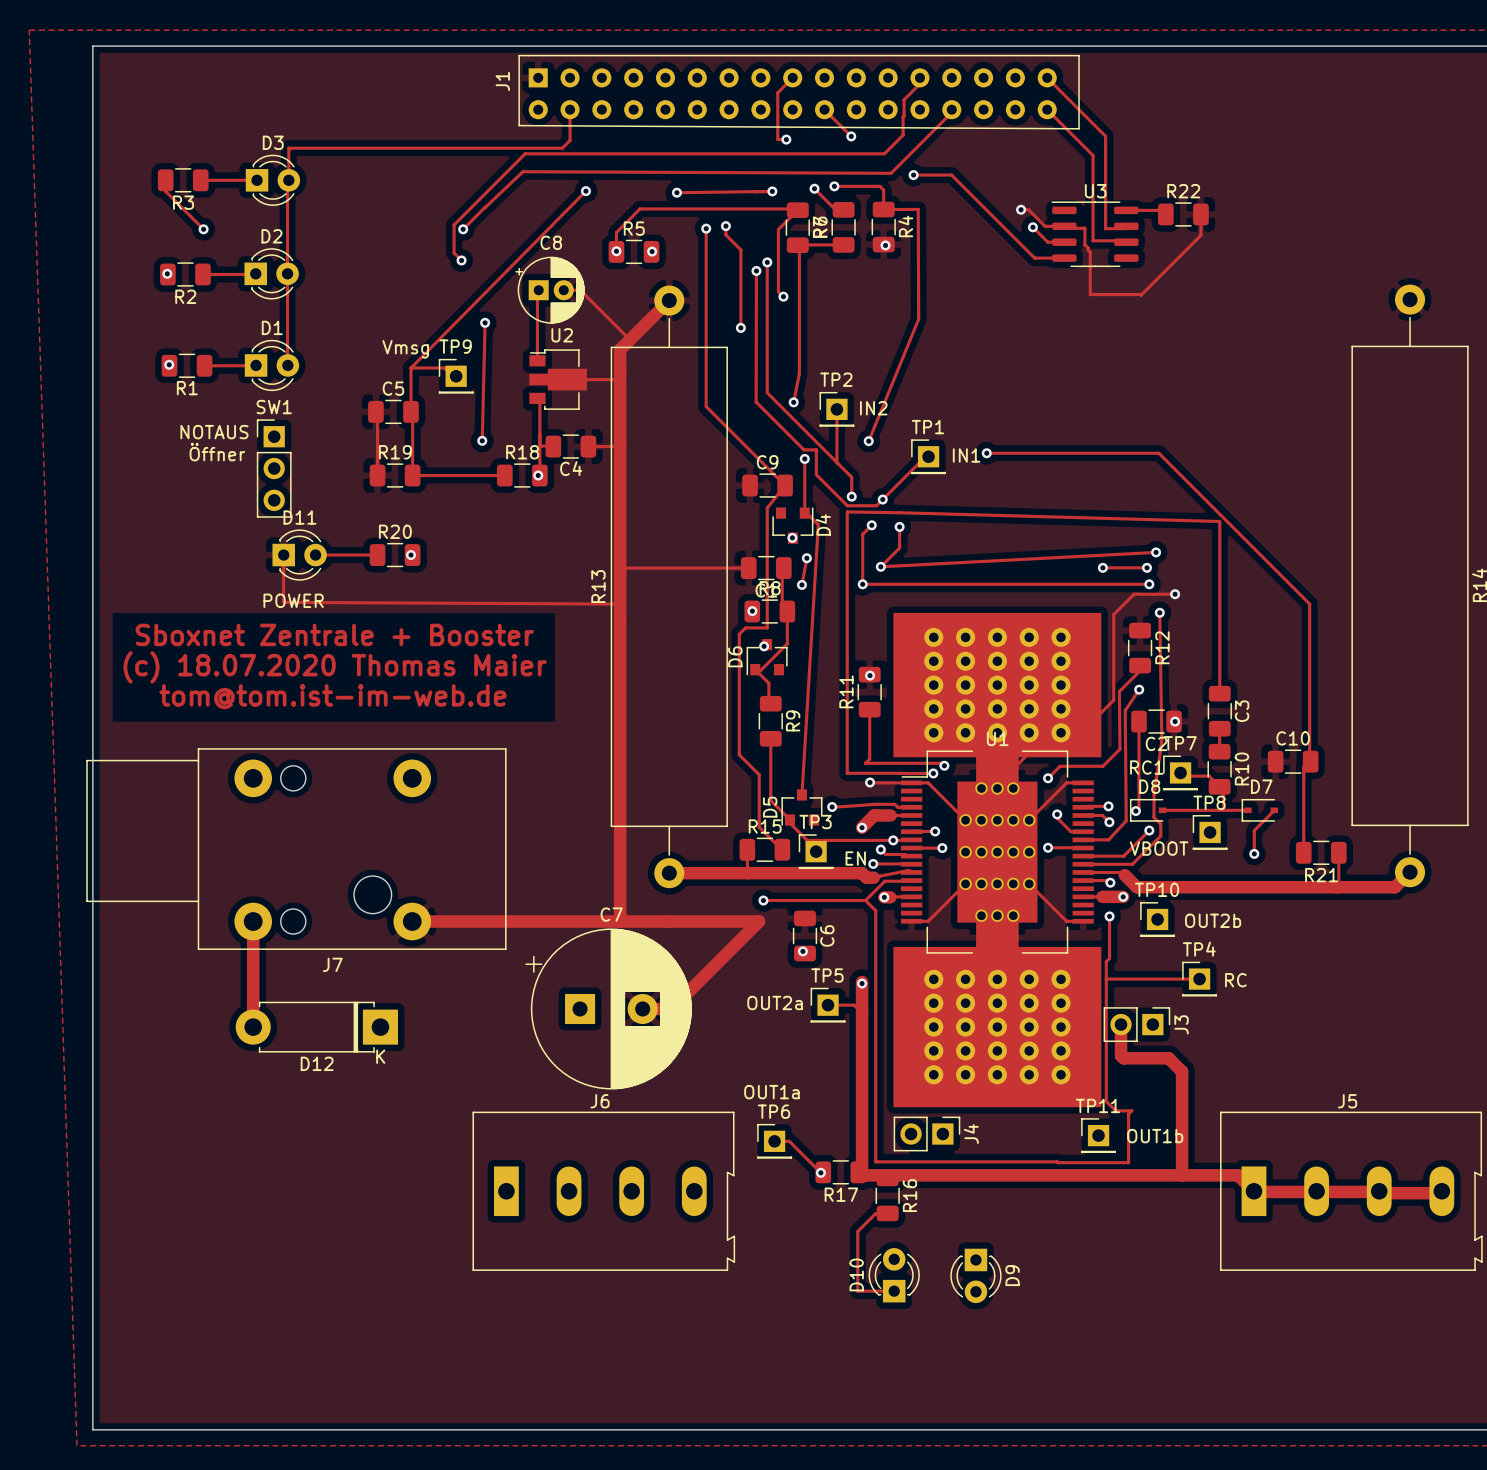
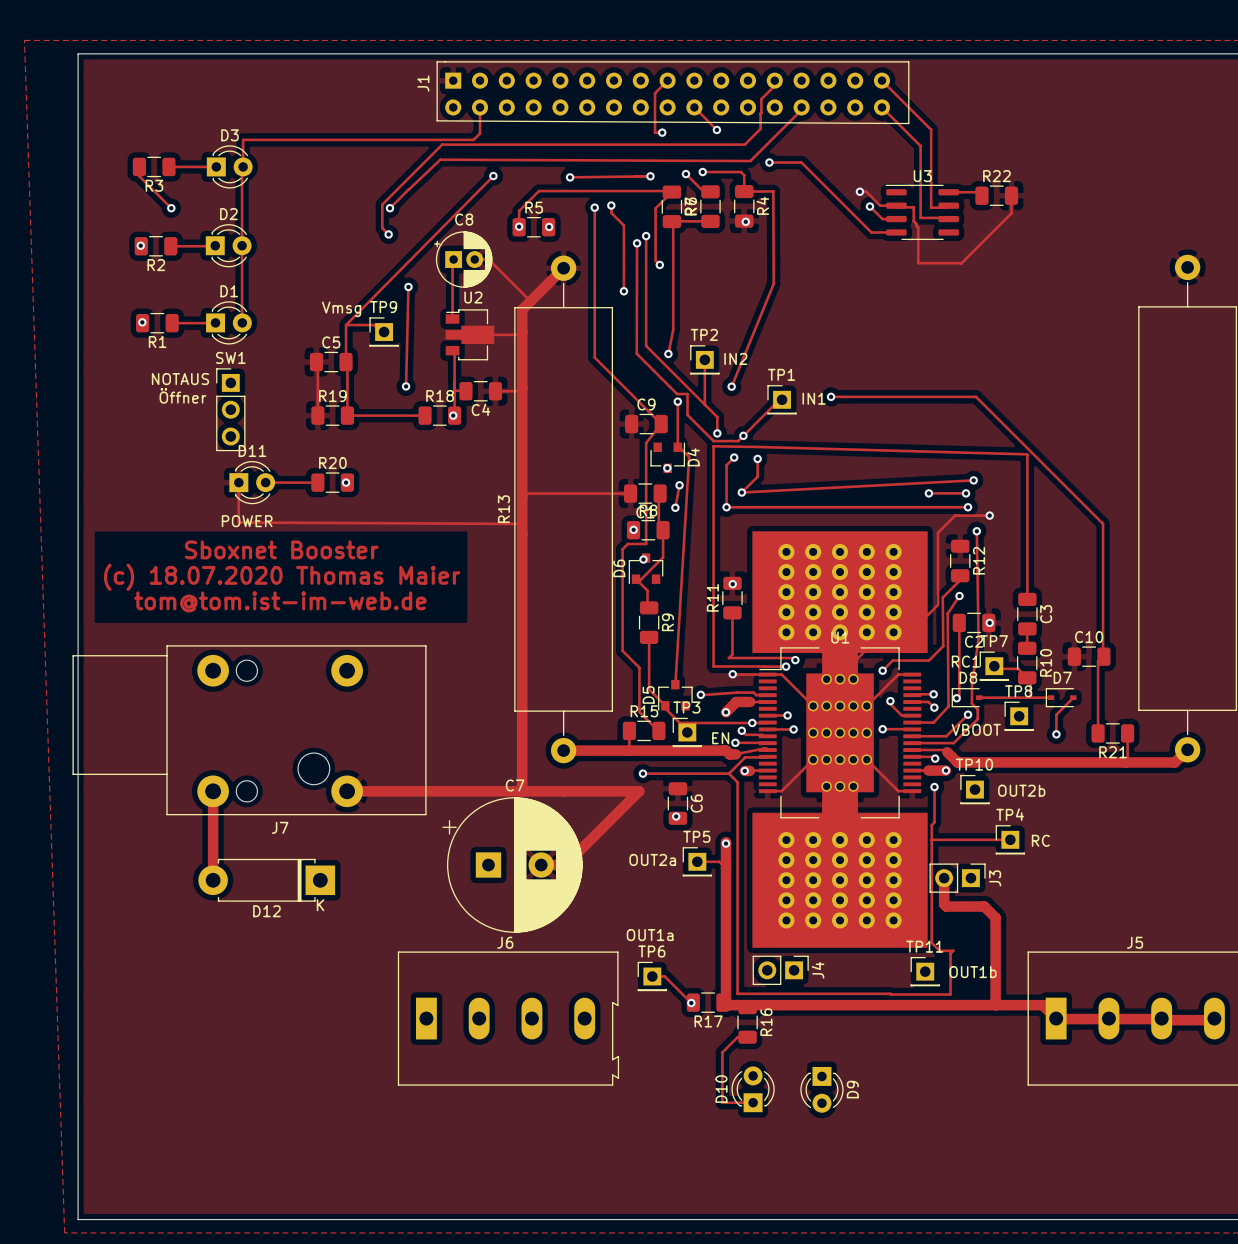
text: Sboxnet Zentrale + Booster (334, 634) -> Sboxnet Booster (281, 549)

